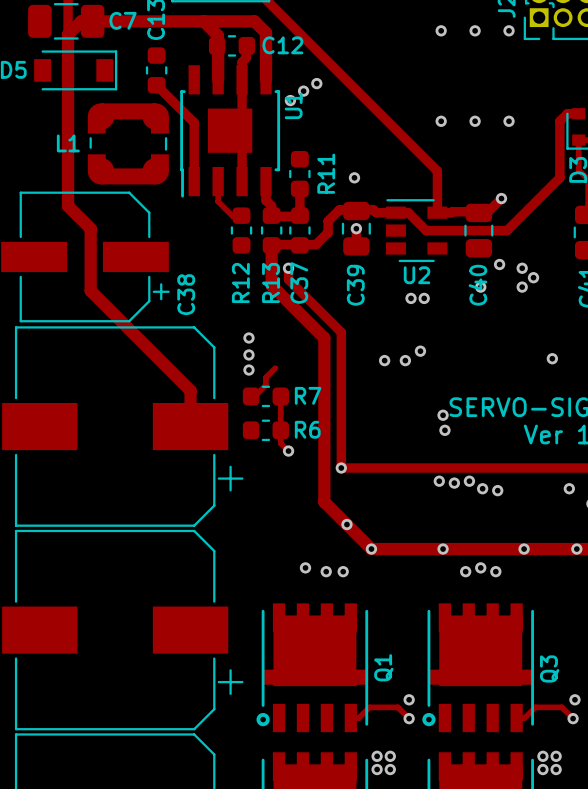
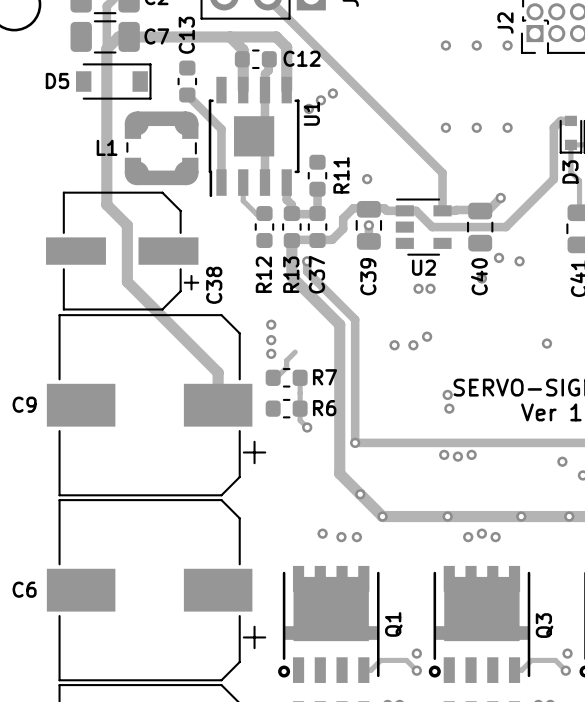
via: (533, 277) -> none
via: (522, 287) -> none
via: (482, 488) -> none
via: (497, 490) -> none

